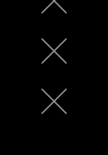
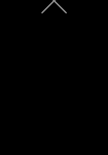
no-connect mark: (54, 51) -> none
no-connect mark: (54, 101) -> none

